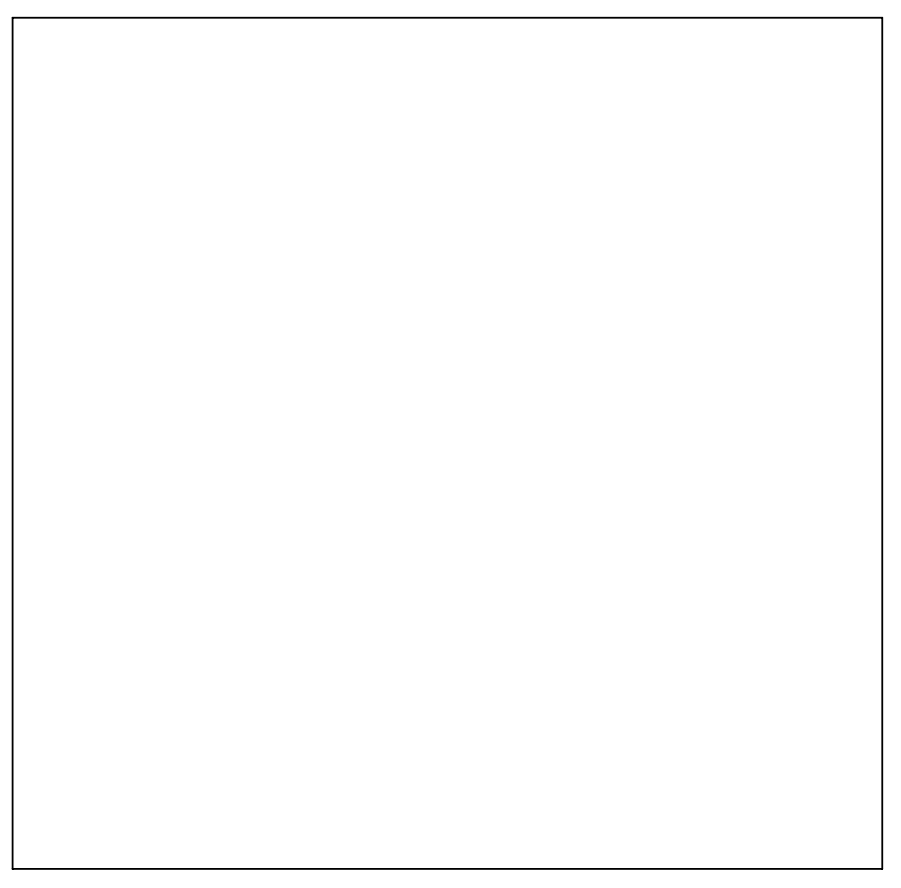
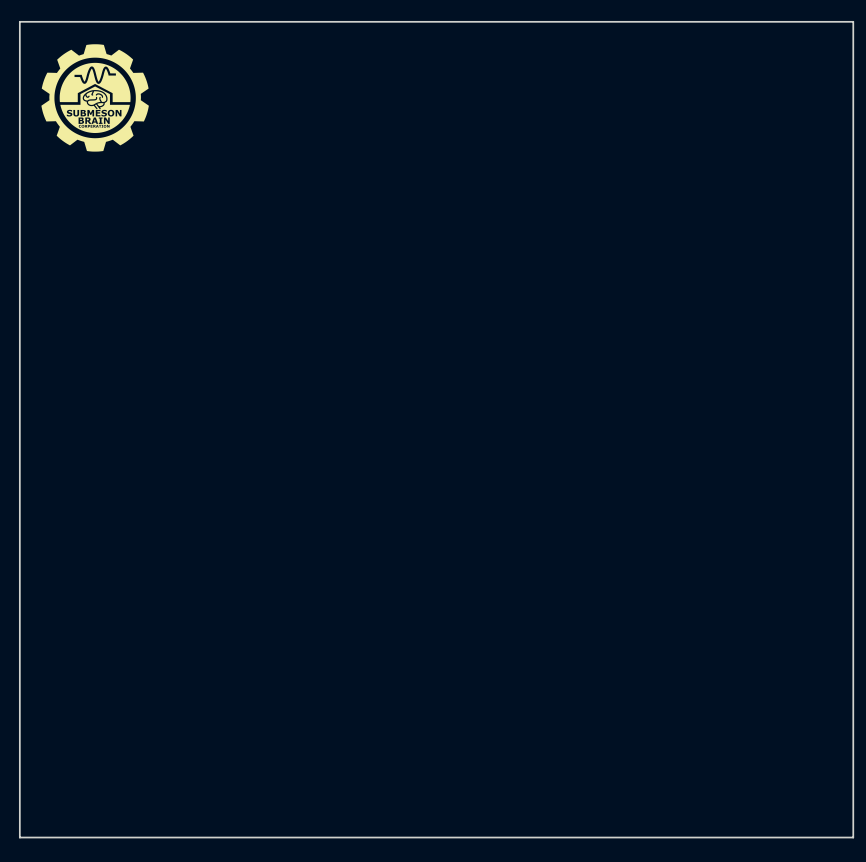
drawing: none -> [41, 44, 149, 152]

